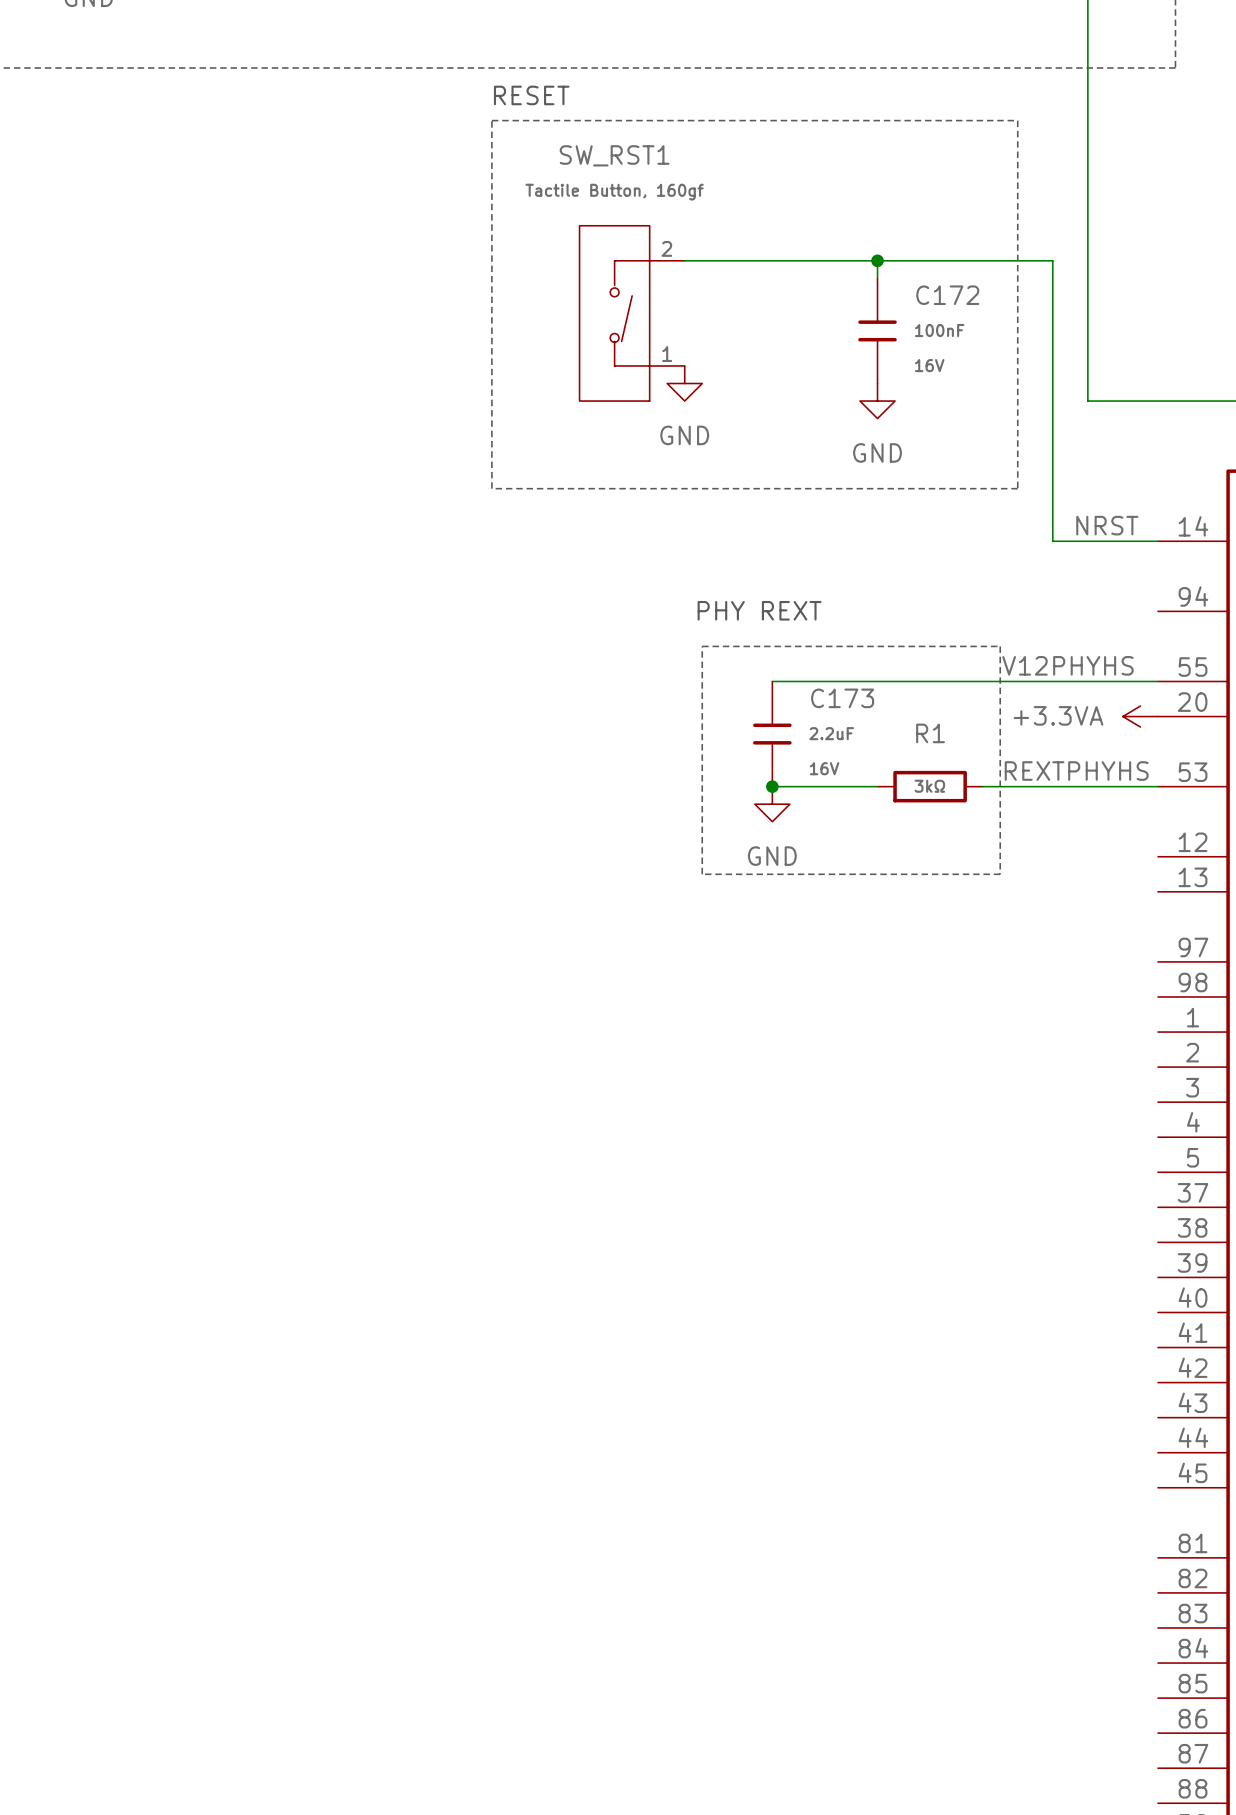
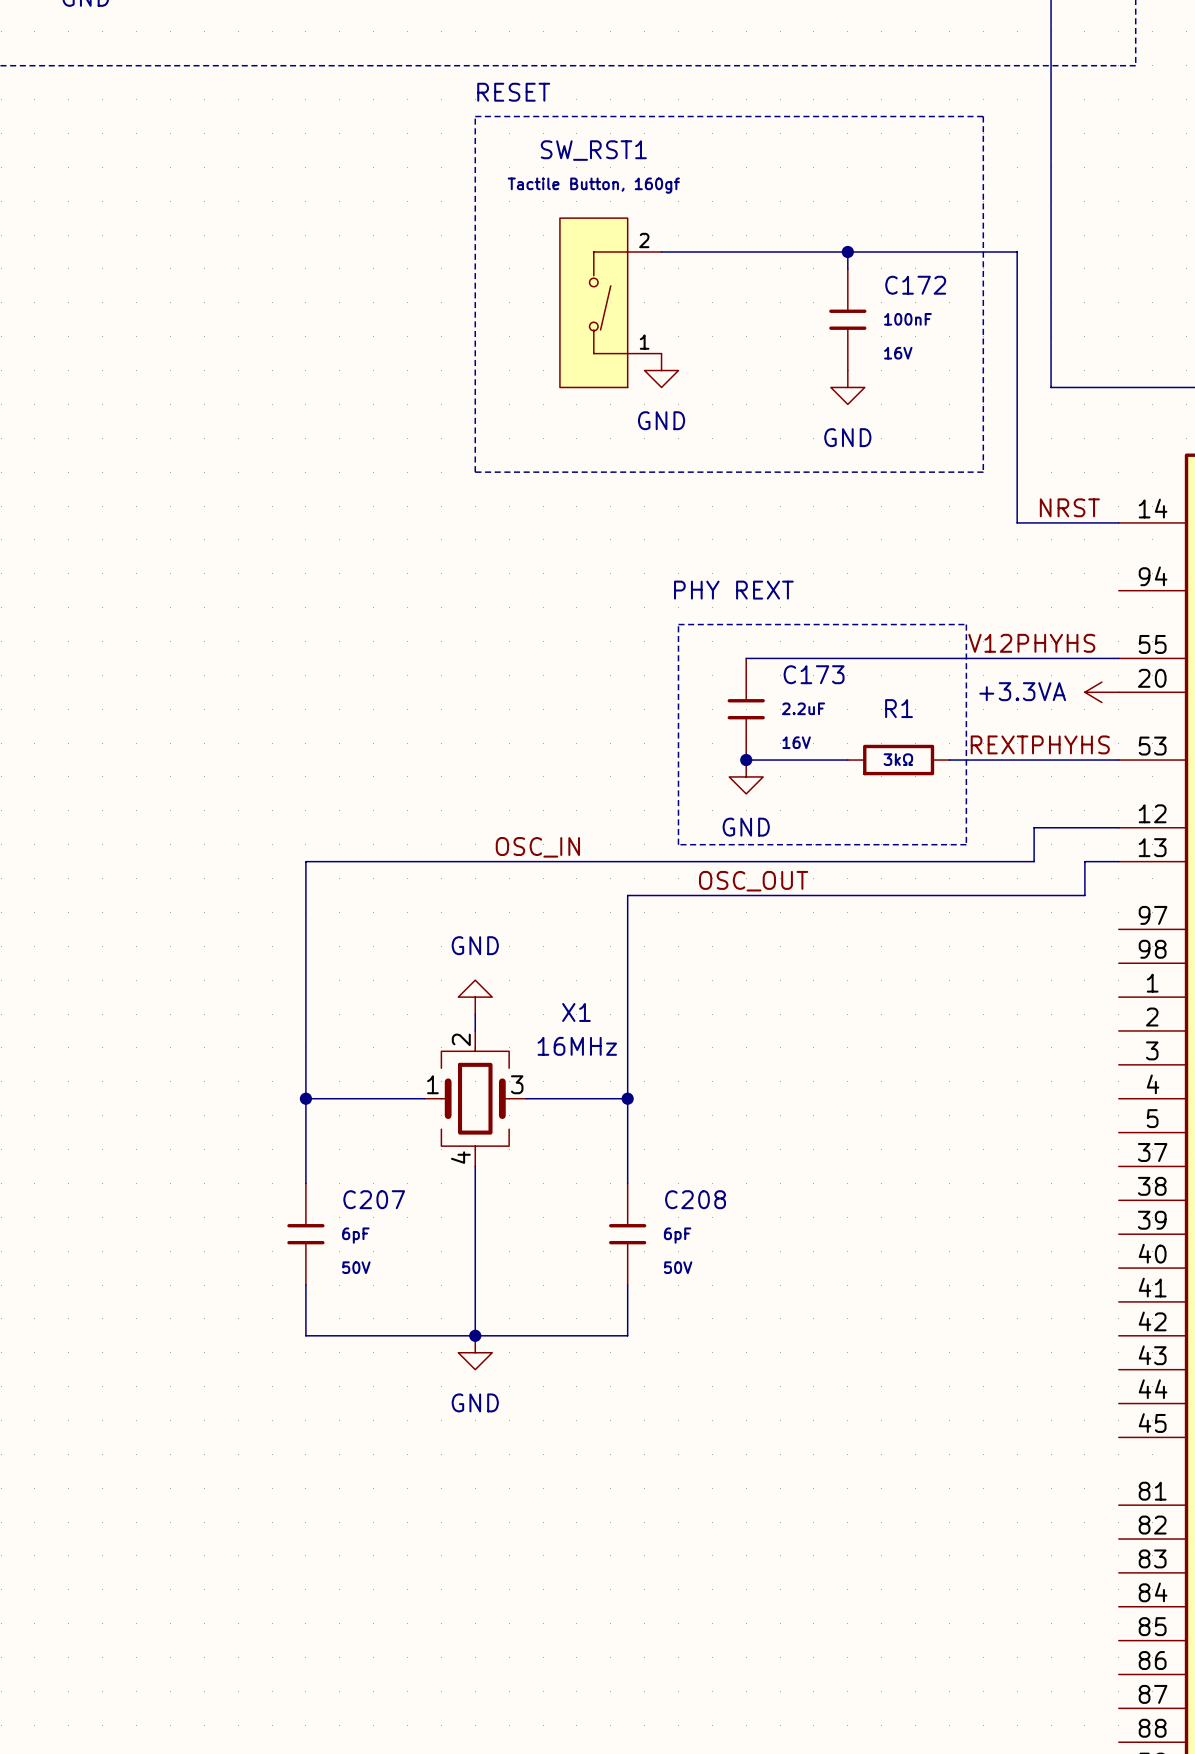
wire: none -> (1118, 827) (1034, 827) (1034, 861) (305, 861) (305, 1183)
label: none -> OSC_IN (537, 847)
wire: none -> (1118, 861) (1084, 861) (1084, 895) (627, 895) (627, 1183)
label: none -> OSC_OUT (753, 881)
power symbol: none -> GND (475, 997)
wire: none -> (475, 1014) (475, 1030)
wire: none -> (305, 1098) (424, 1098)
junction: none -> (305, 1098)
X1: none -> 16MHz (475, 1098)
wire: none -> (526, 1098) (627, 1098)
junction: none -> (627, 1098)
wire: none -> (475, 1166) (475, 1335)
C207: none -> 6pF (305, 1234)
C208: none -> 6pF (627, 1234)
wire: none -> (305, 1285) (305, 1335) (627, 1335) (627, 1285)
junction: none -> (475, 1335)
power symbol: none -> GND (475, 1352)

